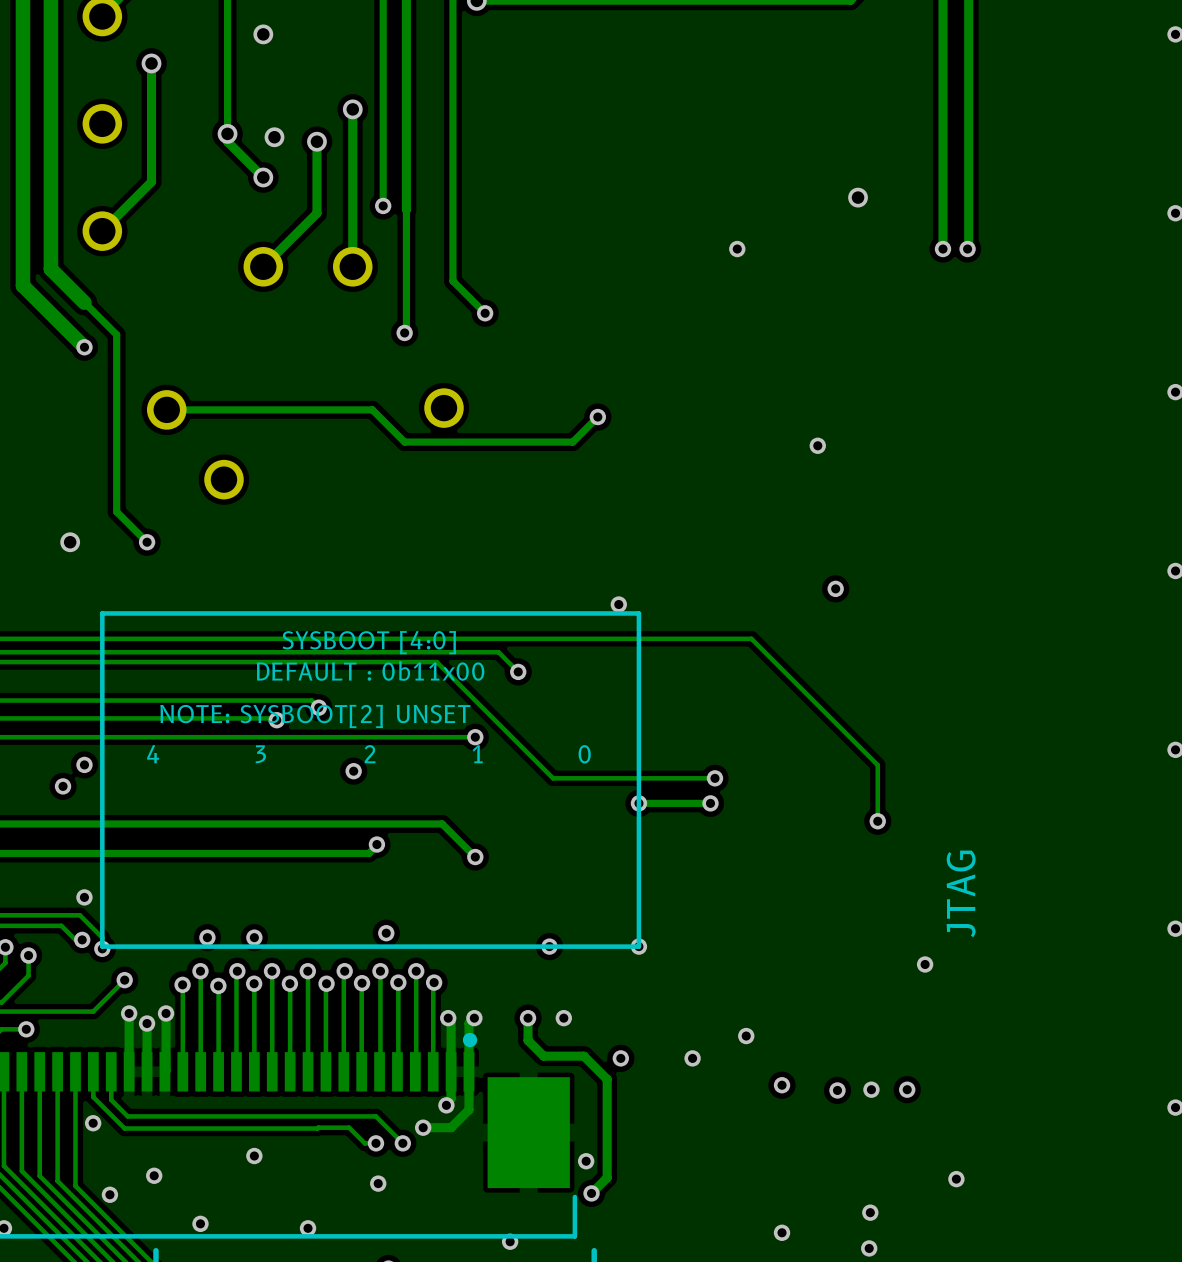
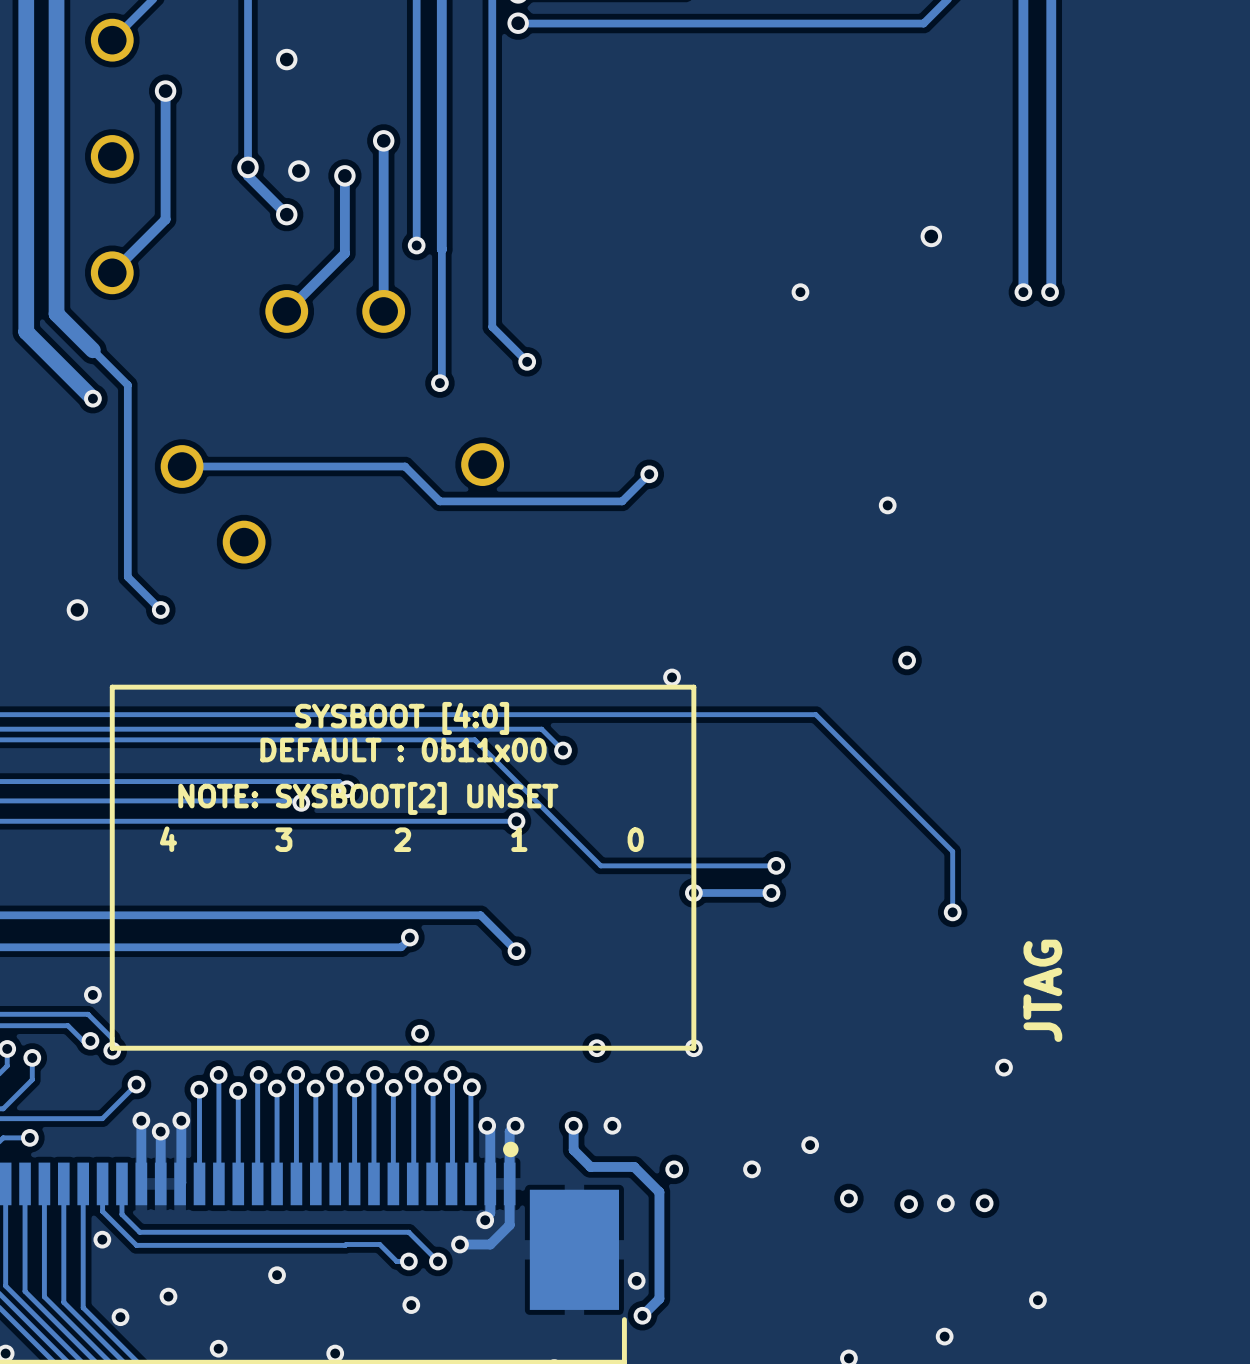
via: (84, 764) -> none
via: (353, 771) -> none
via: (63, 786) -> none
via: (207, 937) -> none
via: (254, 937) -> none

